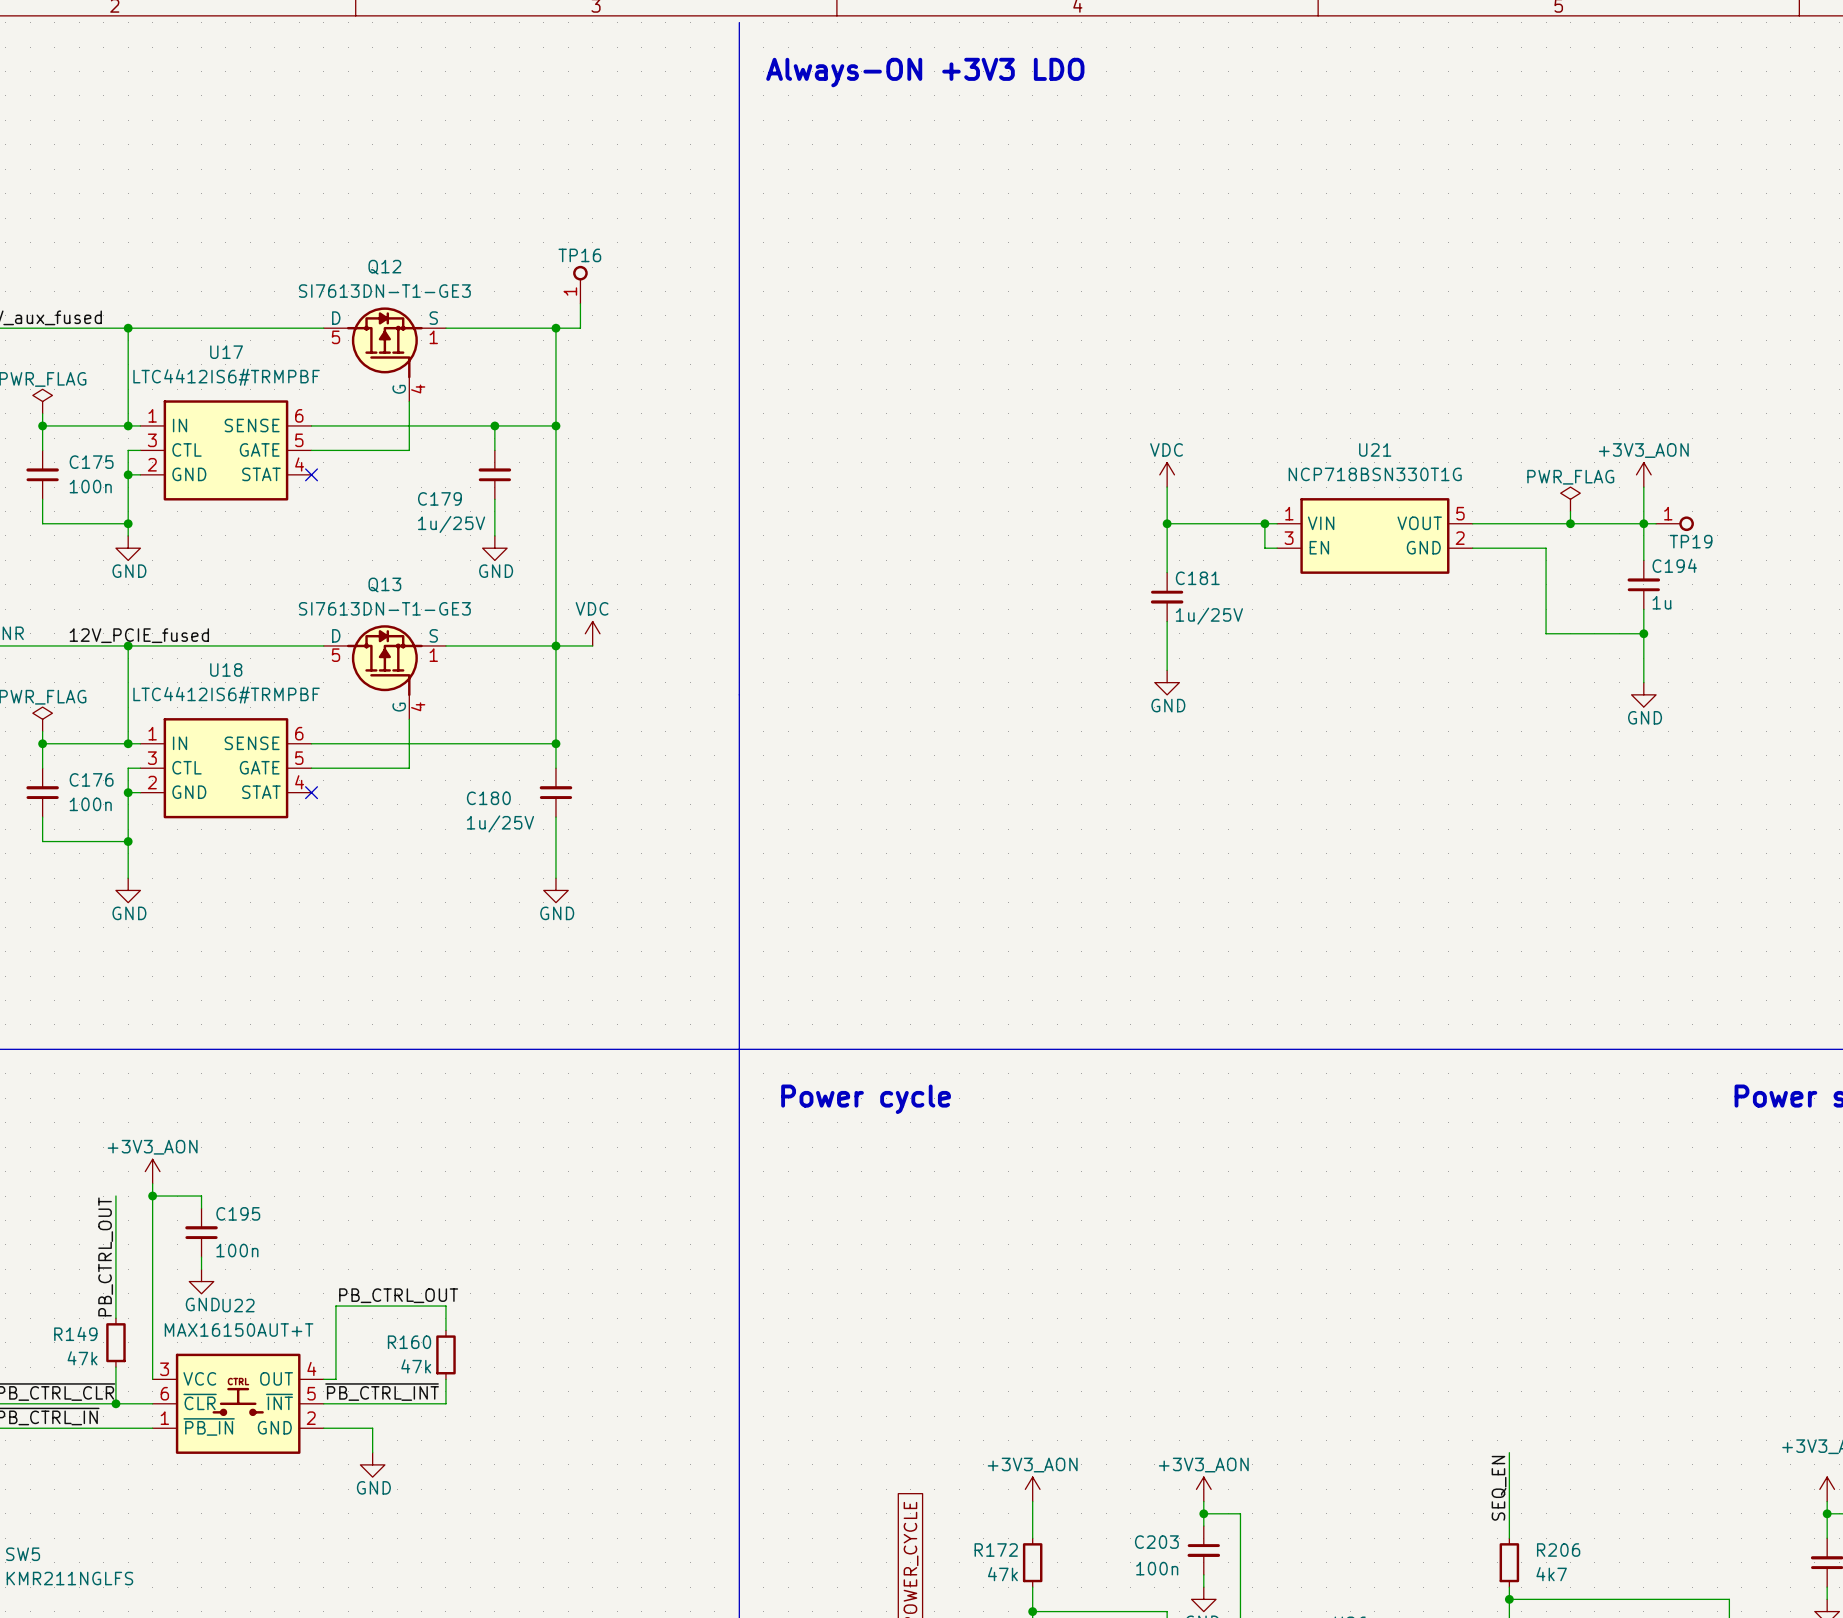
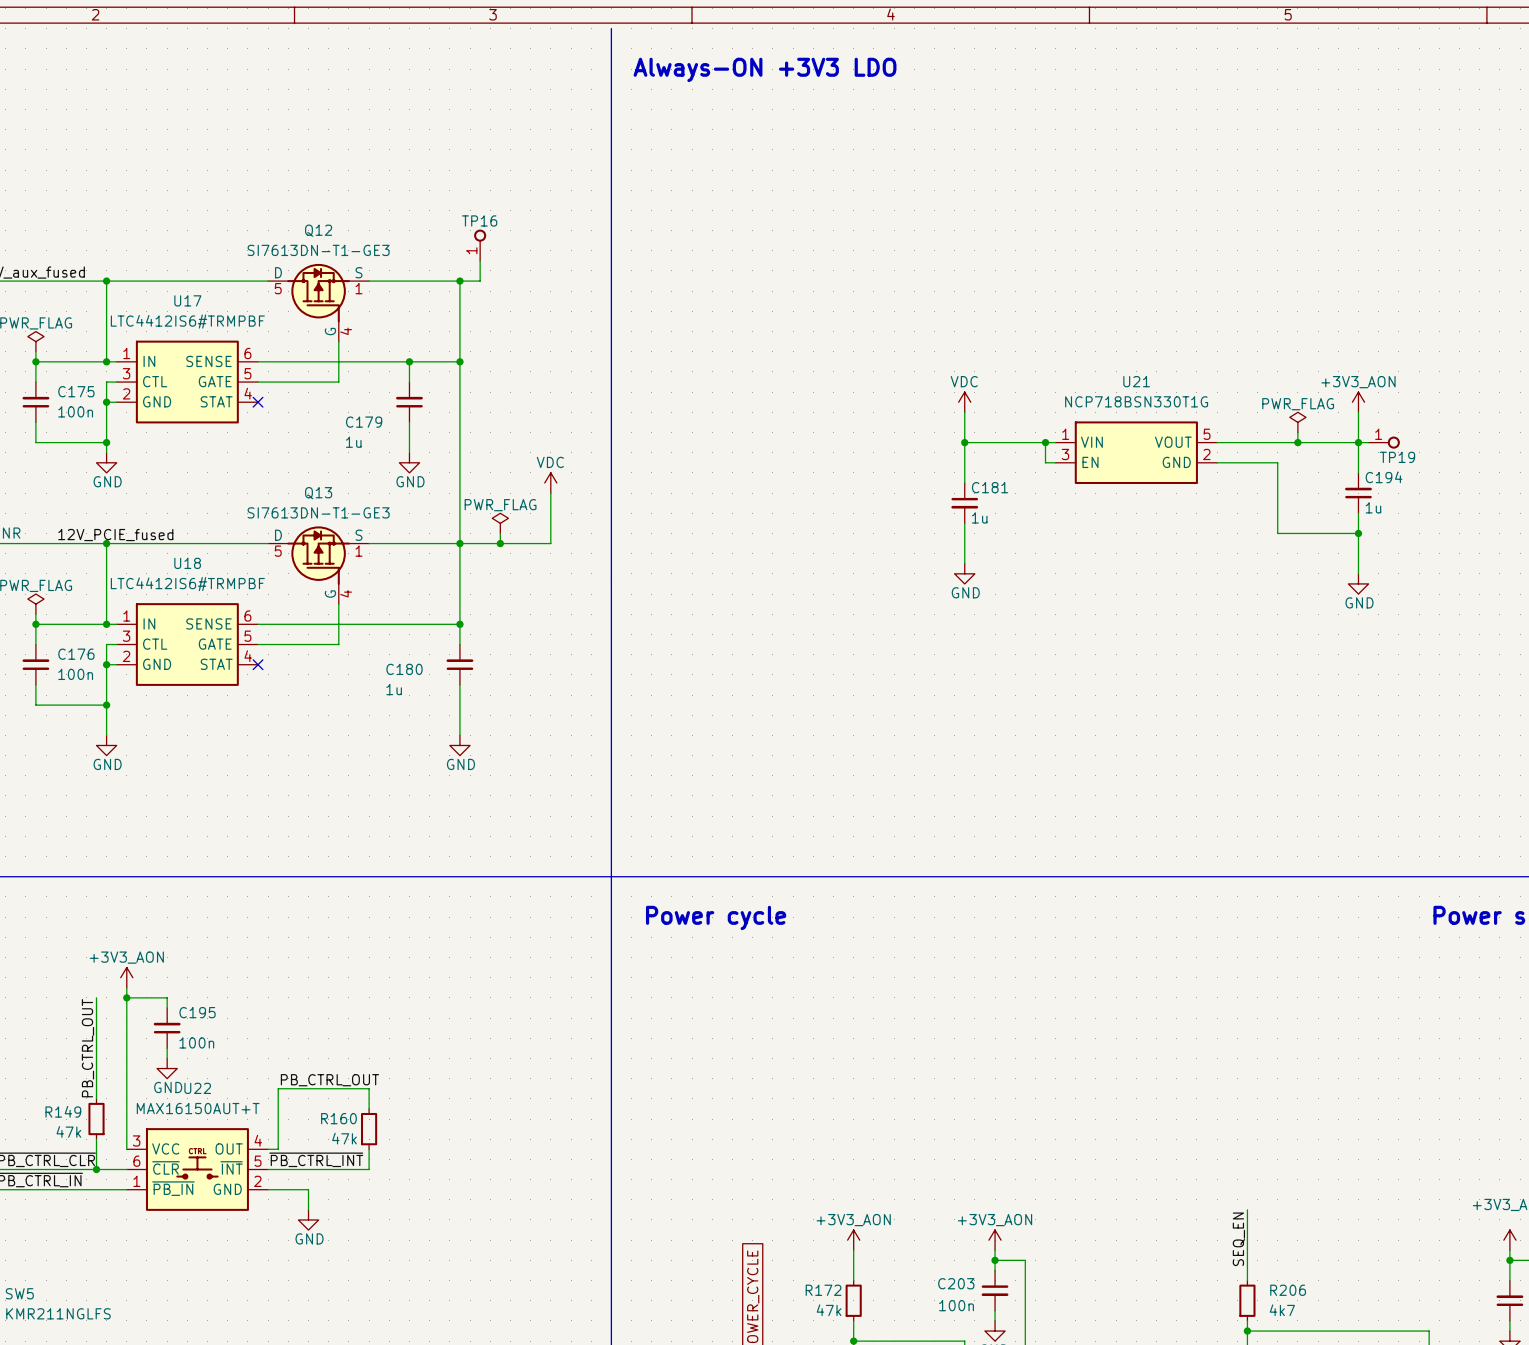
C179 text: 1u/25V (451, 524) -> 1u (353, 442)
wire: none -> (550, 493) (550, 543) (490, 543)
C181 text: 1u/25V (1209, 616) -> 1u (979, 517)
power symbol: none -> PWR_FLAG (500, 523)
power symbol position: VDC (592, 633) -> VDC (550, 482)
wire: none -> (500, 533) (500, 543)
junction: none -> (500, 543)
C180 text: 1u/25V (500, 823) -> 1u (394, 689)

